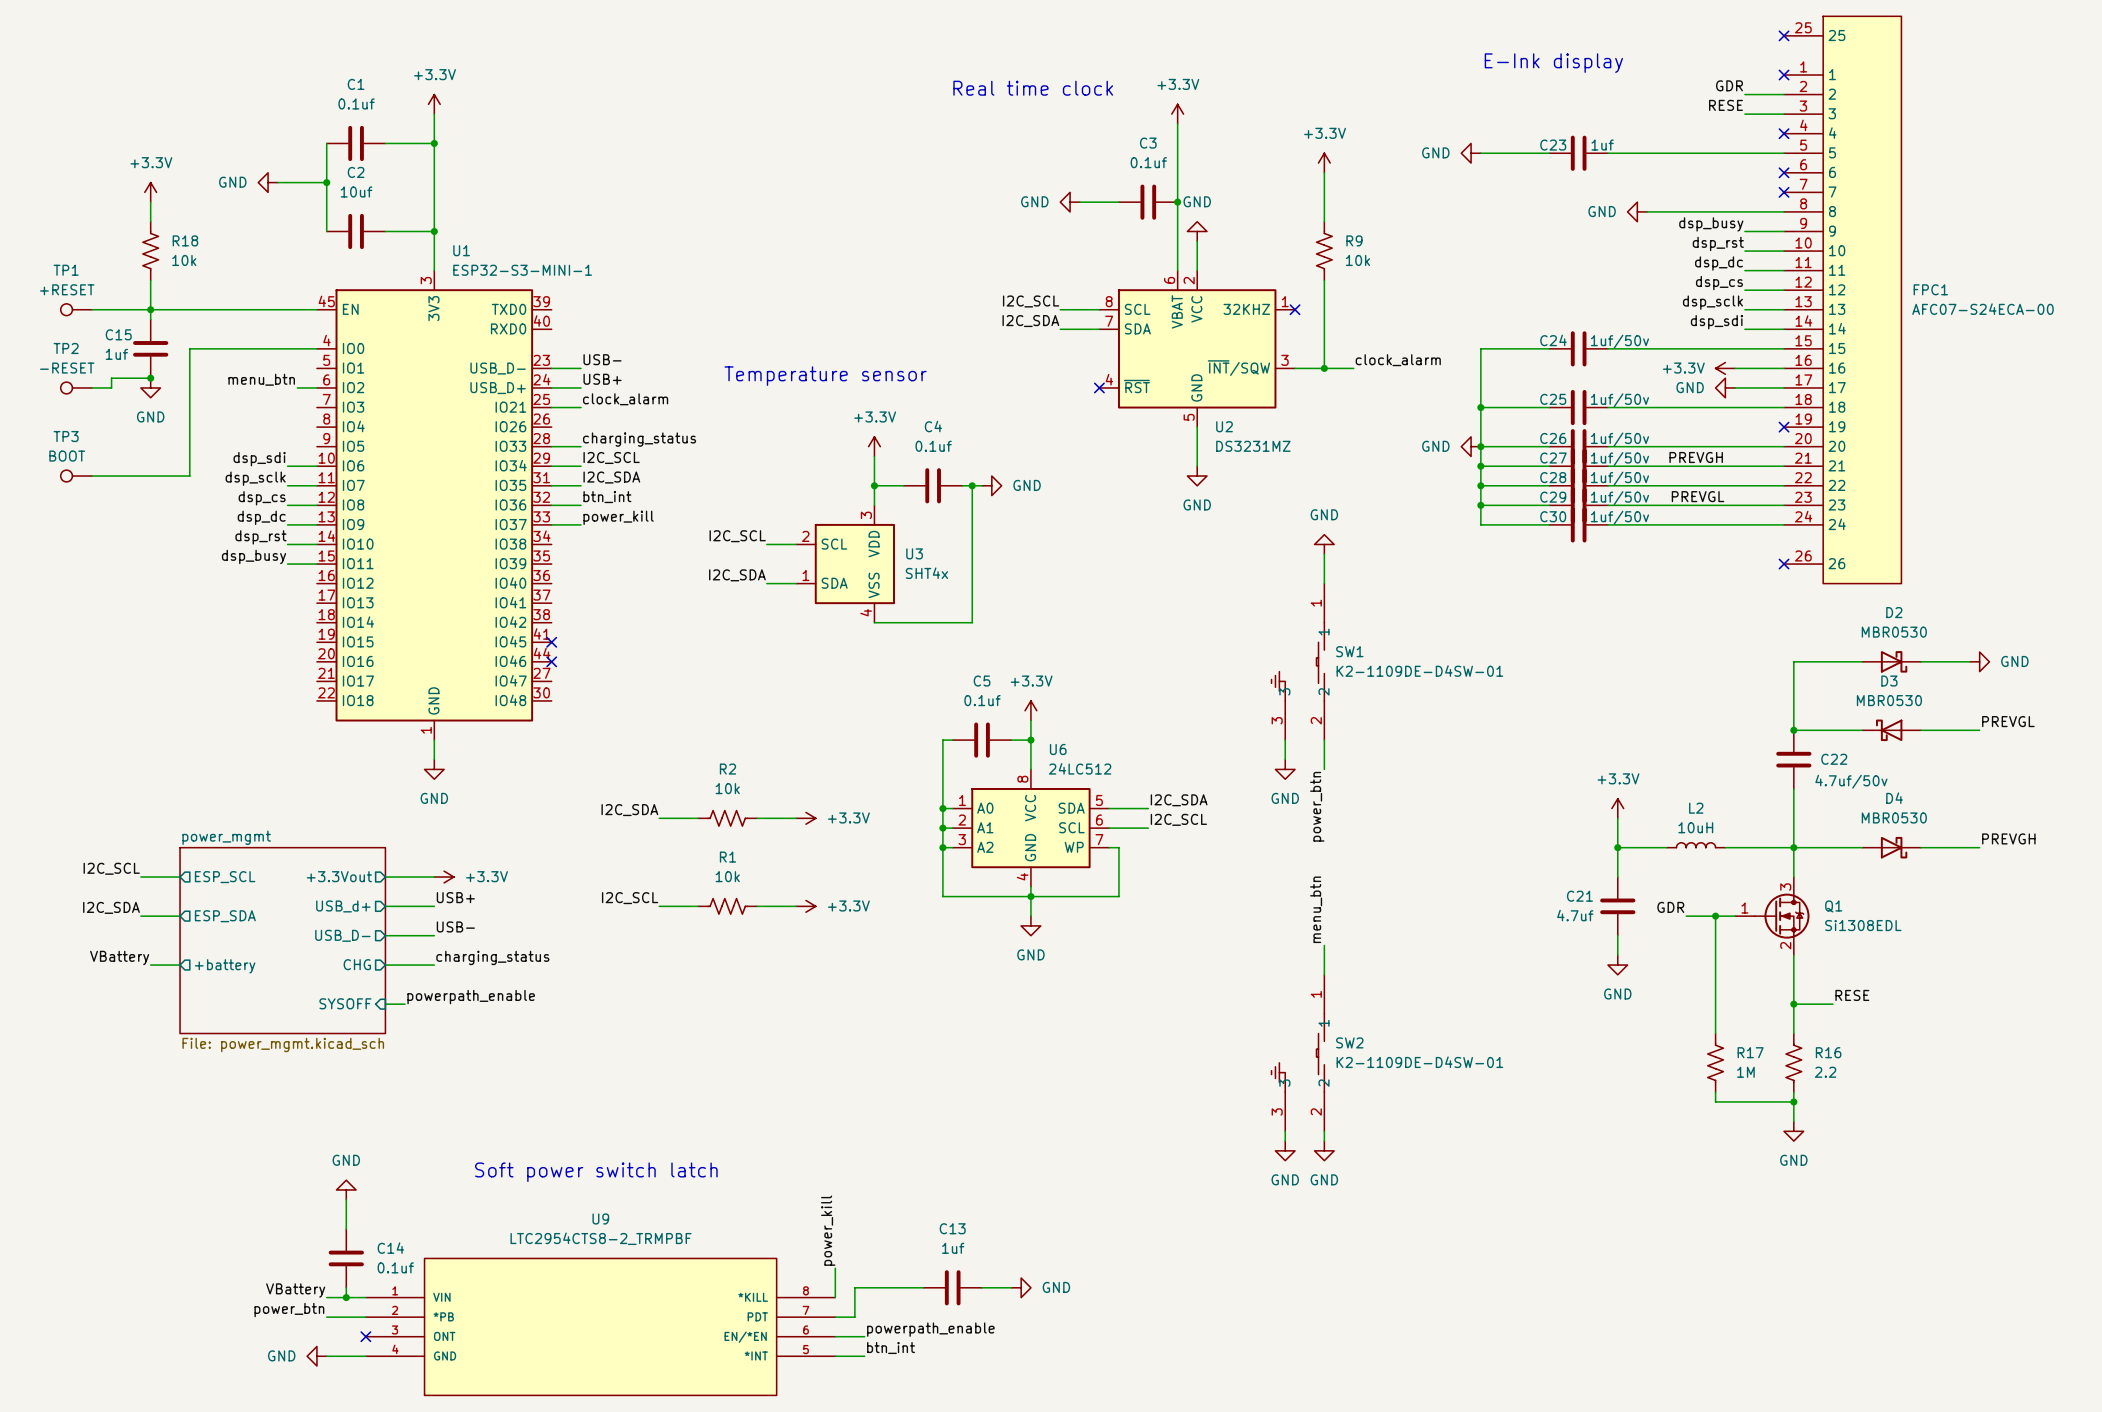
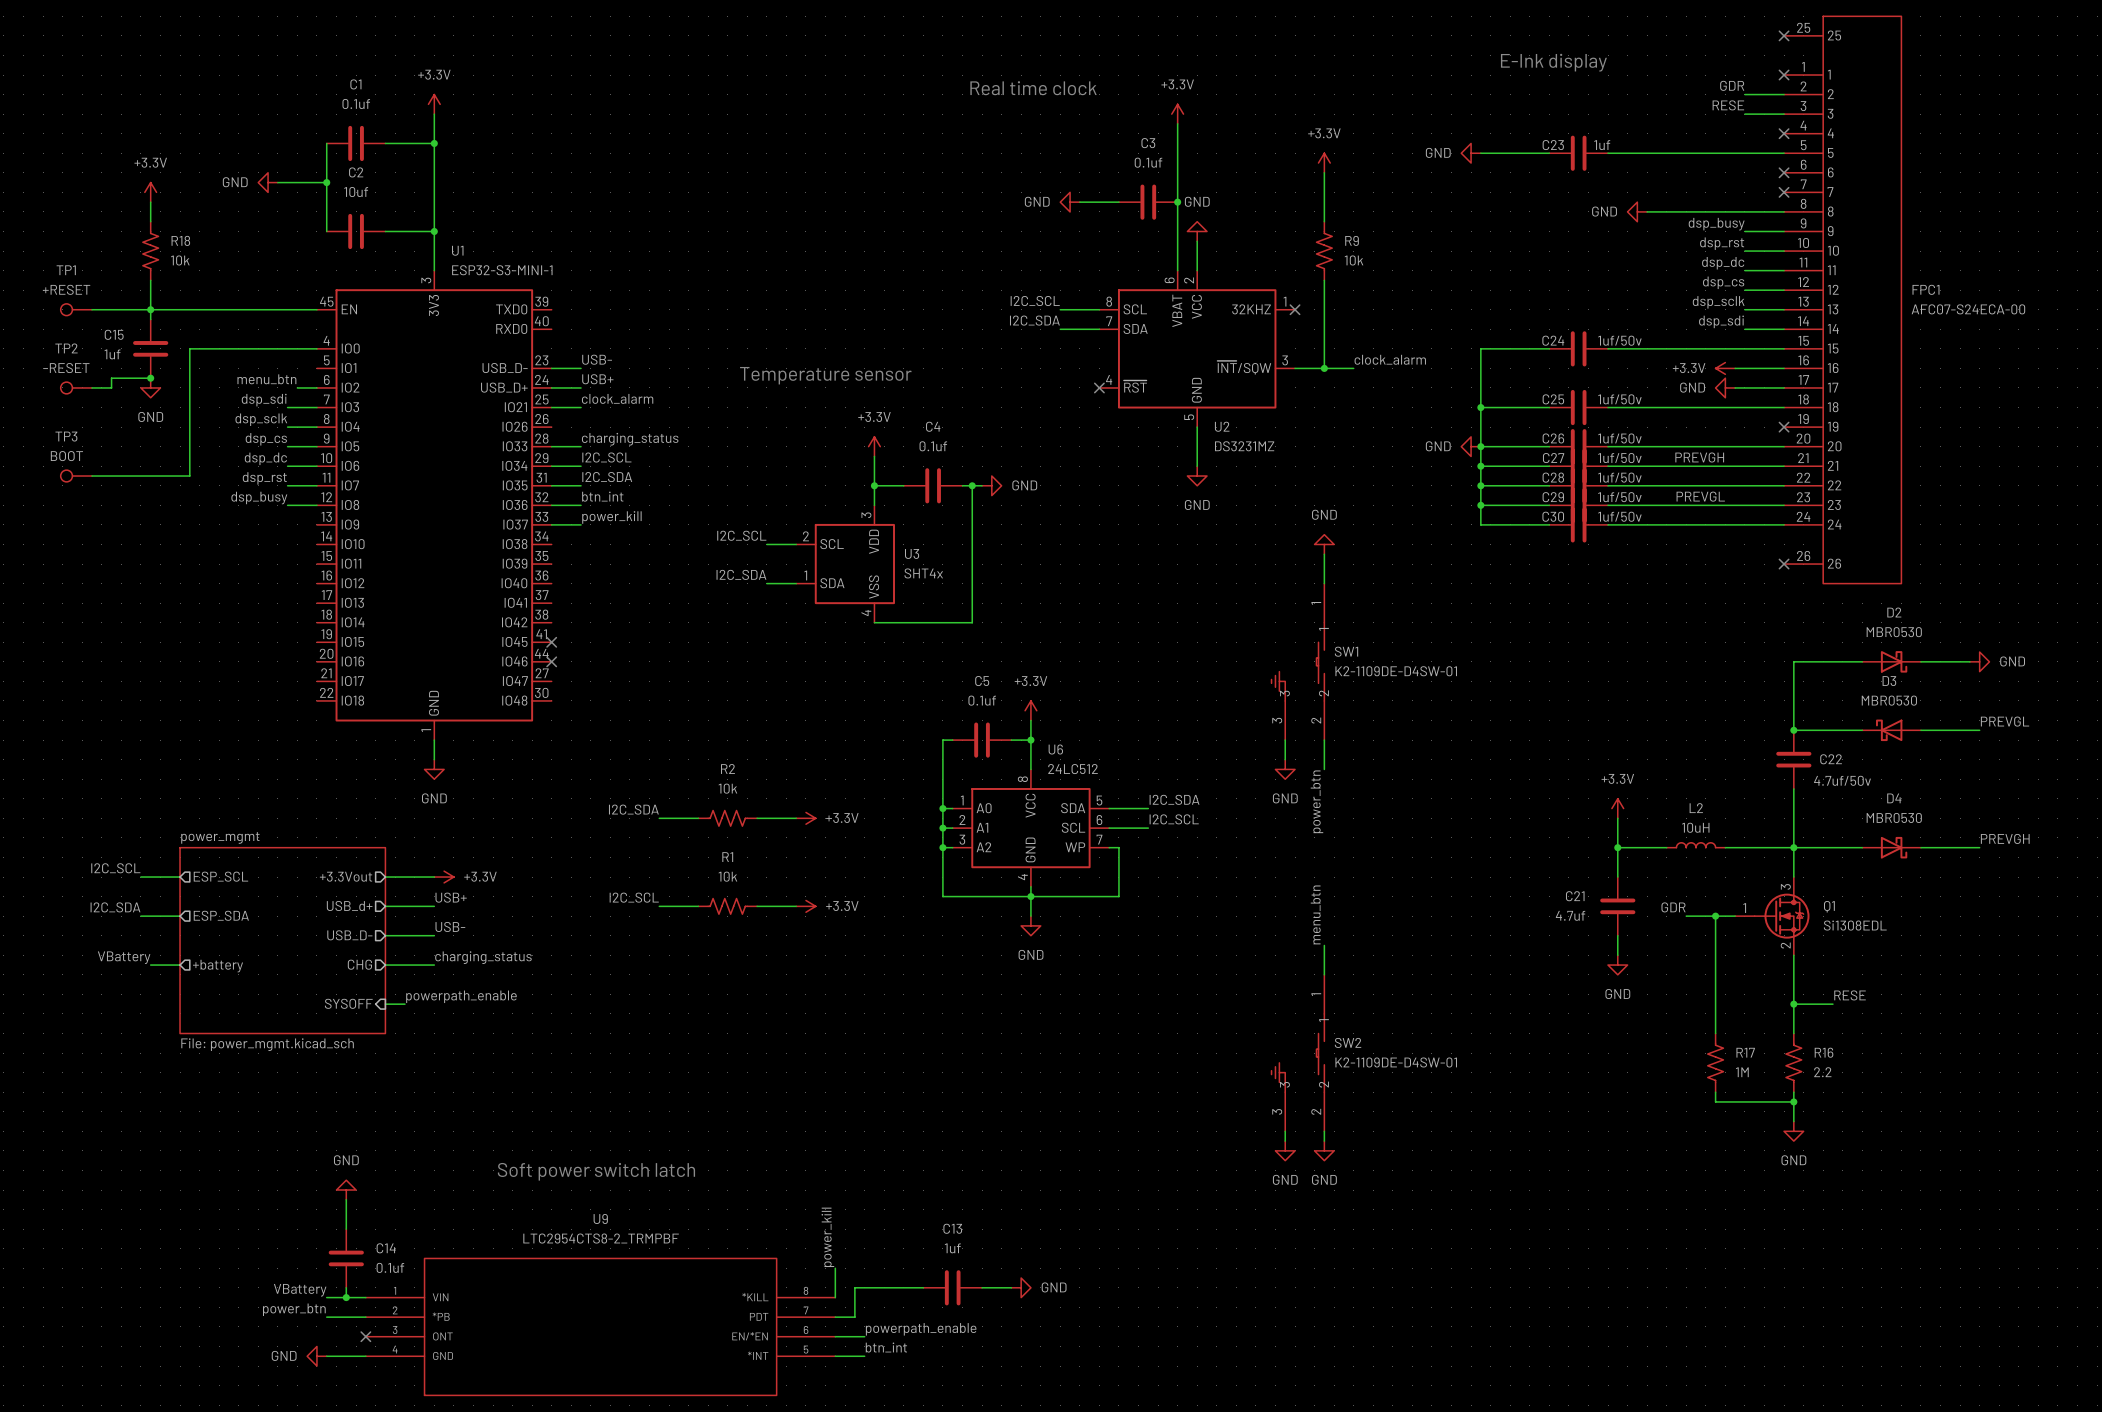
label: none -> dsp_sdi (264, 400)
label: none -> dsp_sclk (261, 419)
label: none -> dsp_cs (266, 439)
label: dsp_sdi (259, 459) -> dsp_dc (265, 458)
label: dsp_sclk (255, 478) -> dsp_rst (264, 478)
label: dsp_cs (262, 498) -> dsp_busy (259, 498)
label: dsp_dc (261, 517) -> none
wire: (287, 524) (316, 524) -> (287, 446) (316, 446)
label: dsp_rst (260, 537) -> none
wire: (287, 544) (316, 544) -> (287, 427) (316, 427)
label: dsp_busy (254, 556) -> none
wire: (287, 564) (316, 564) -> (287, 407) (316, 407)

